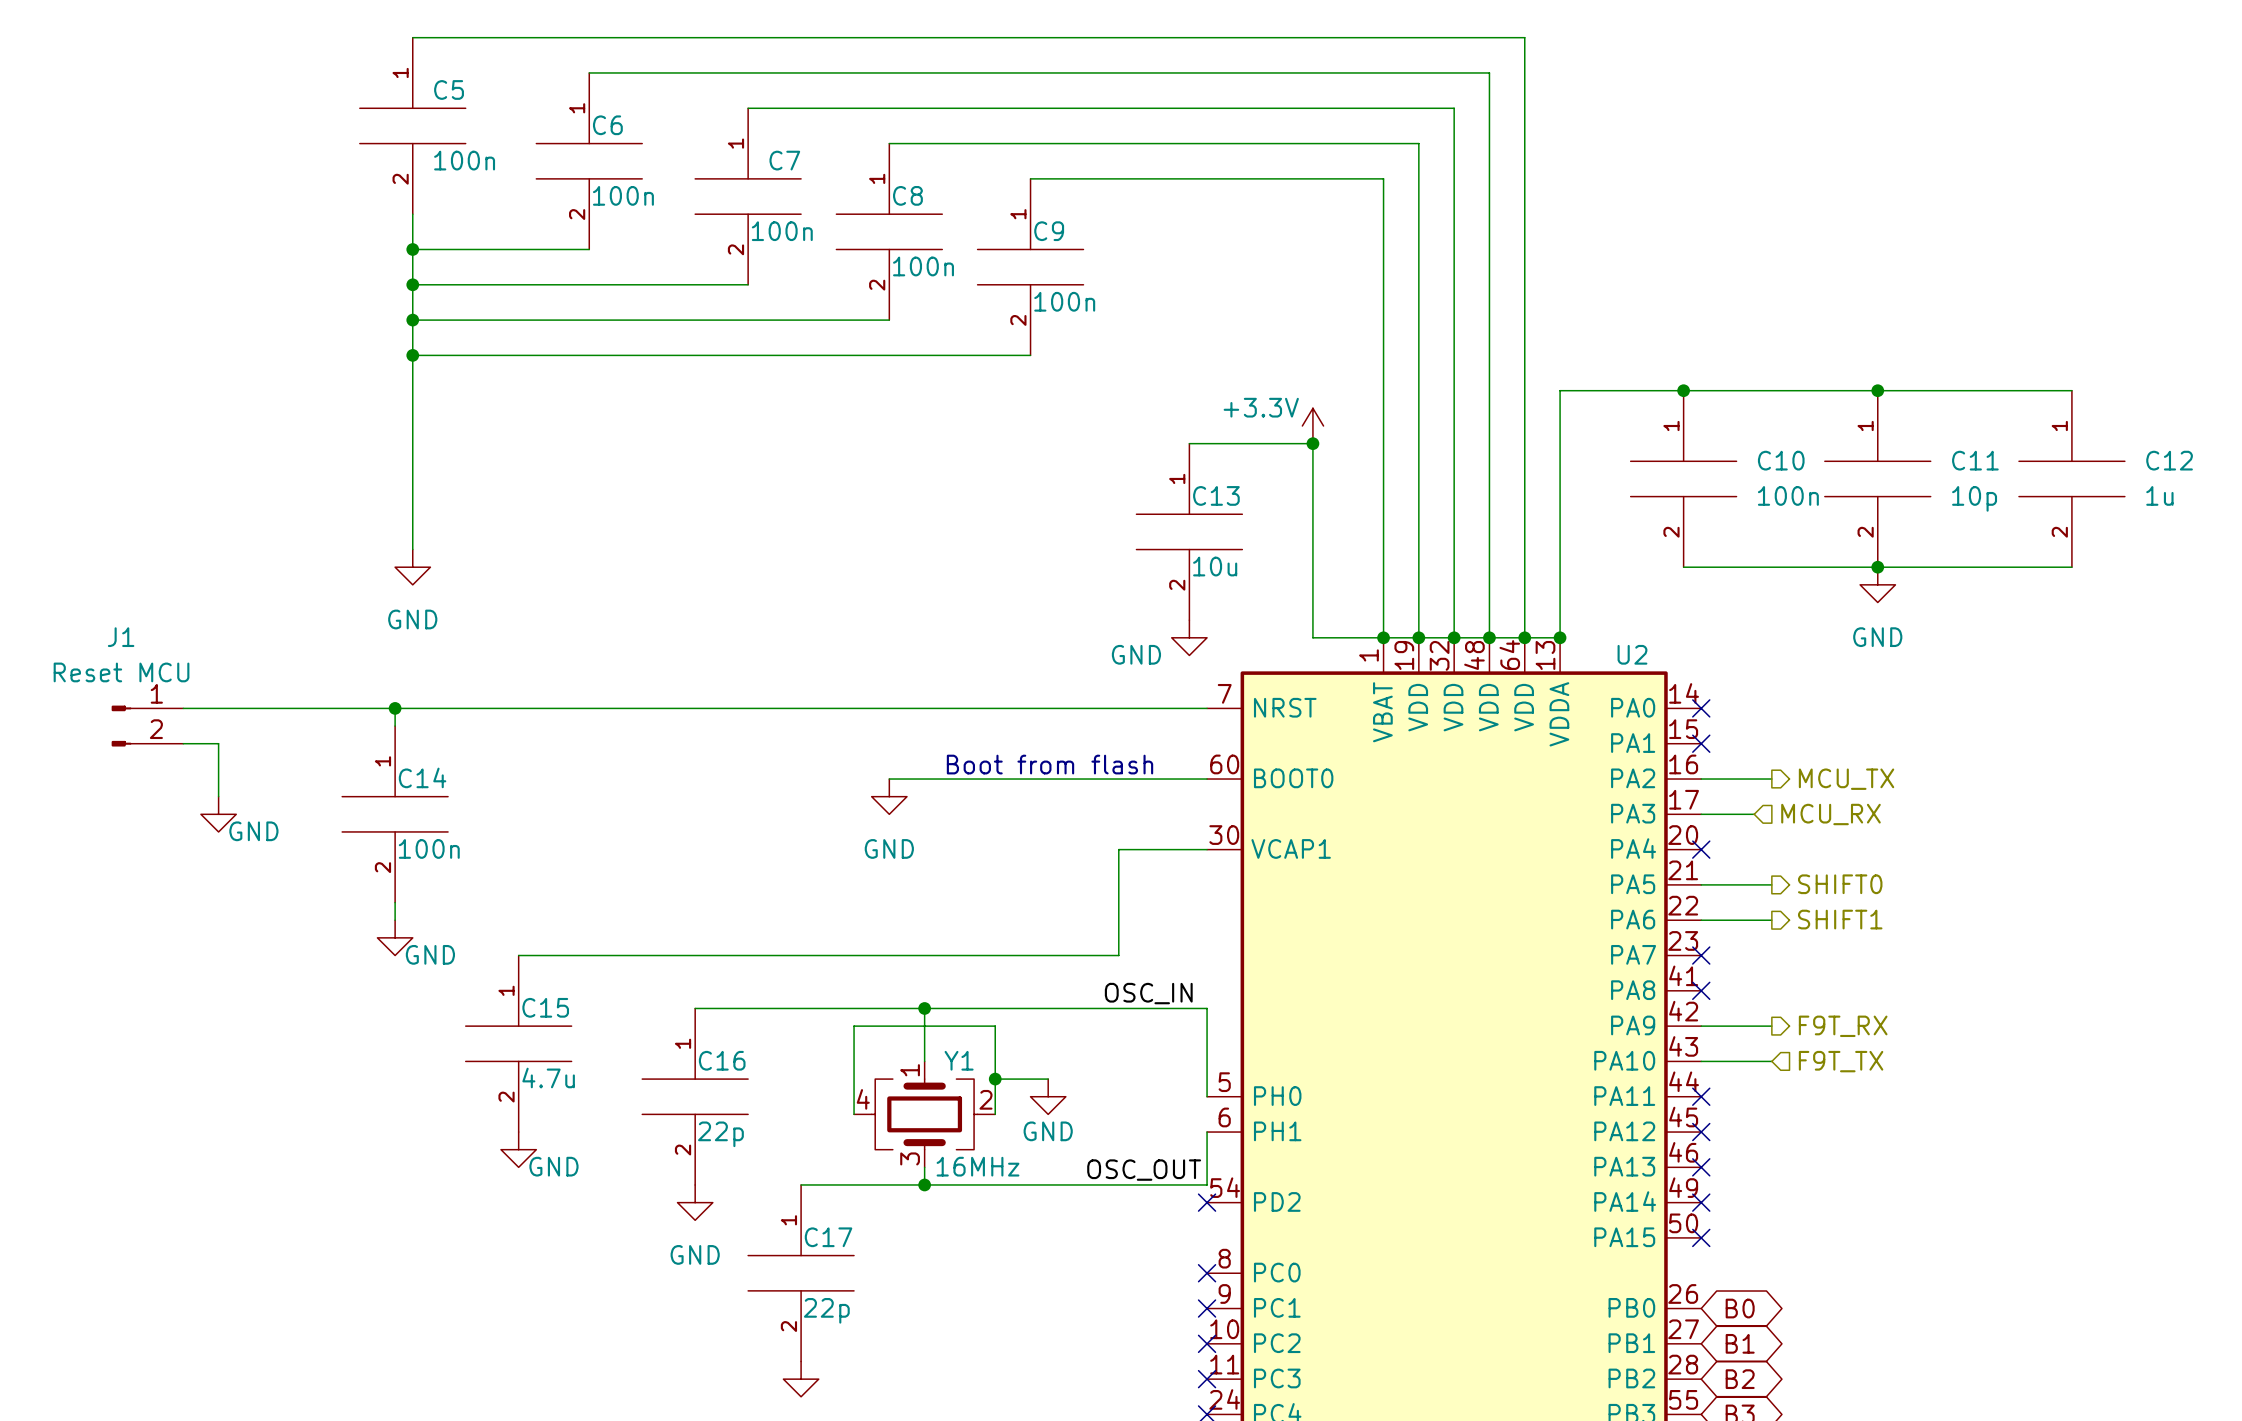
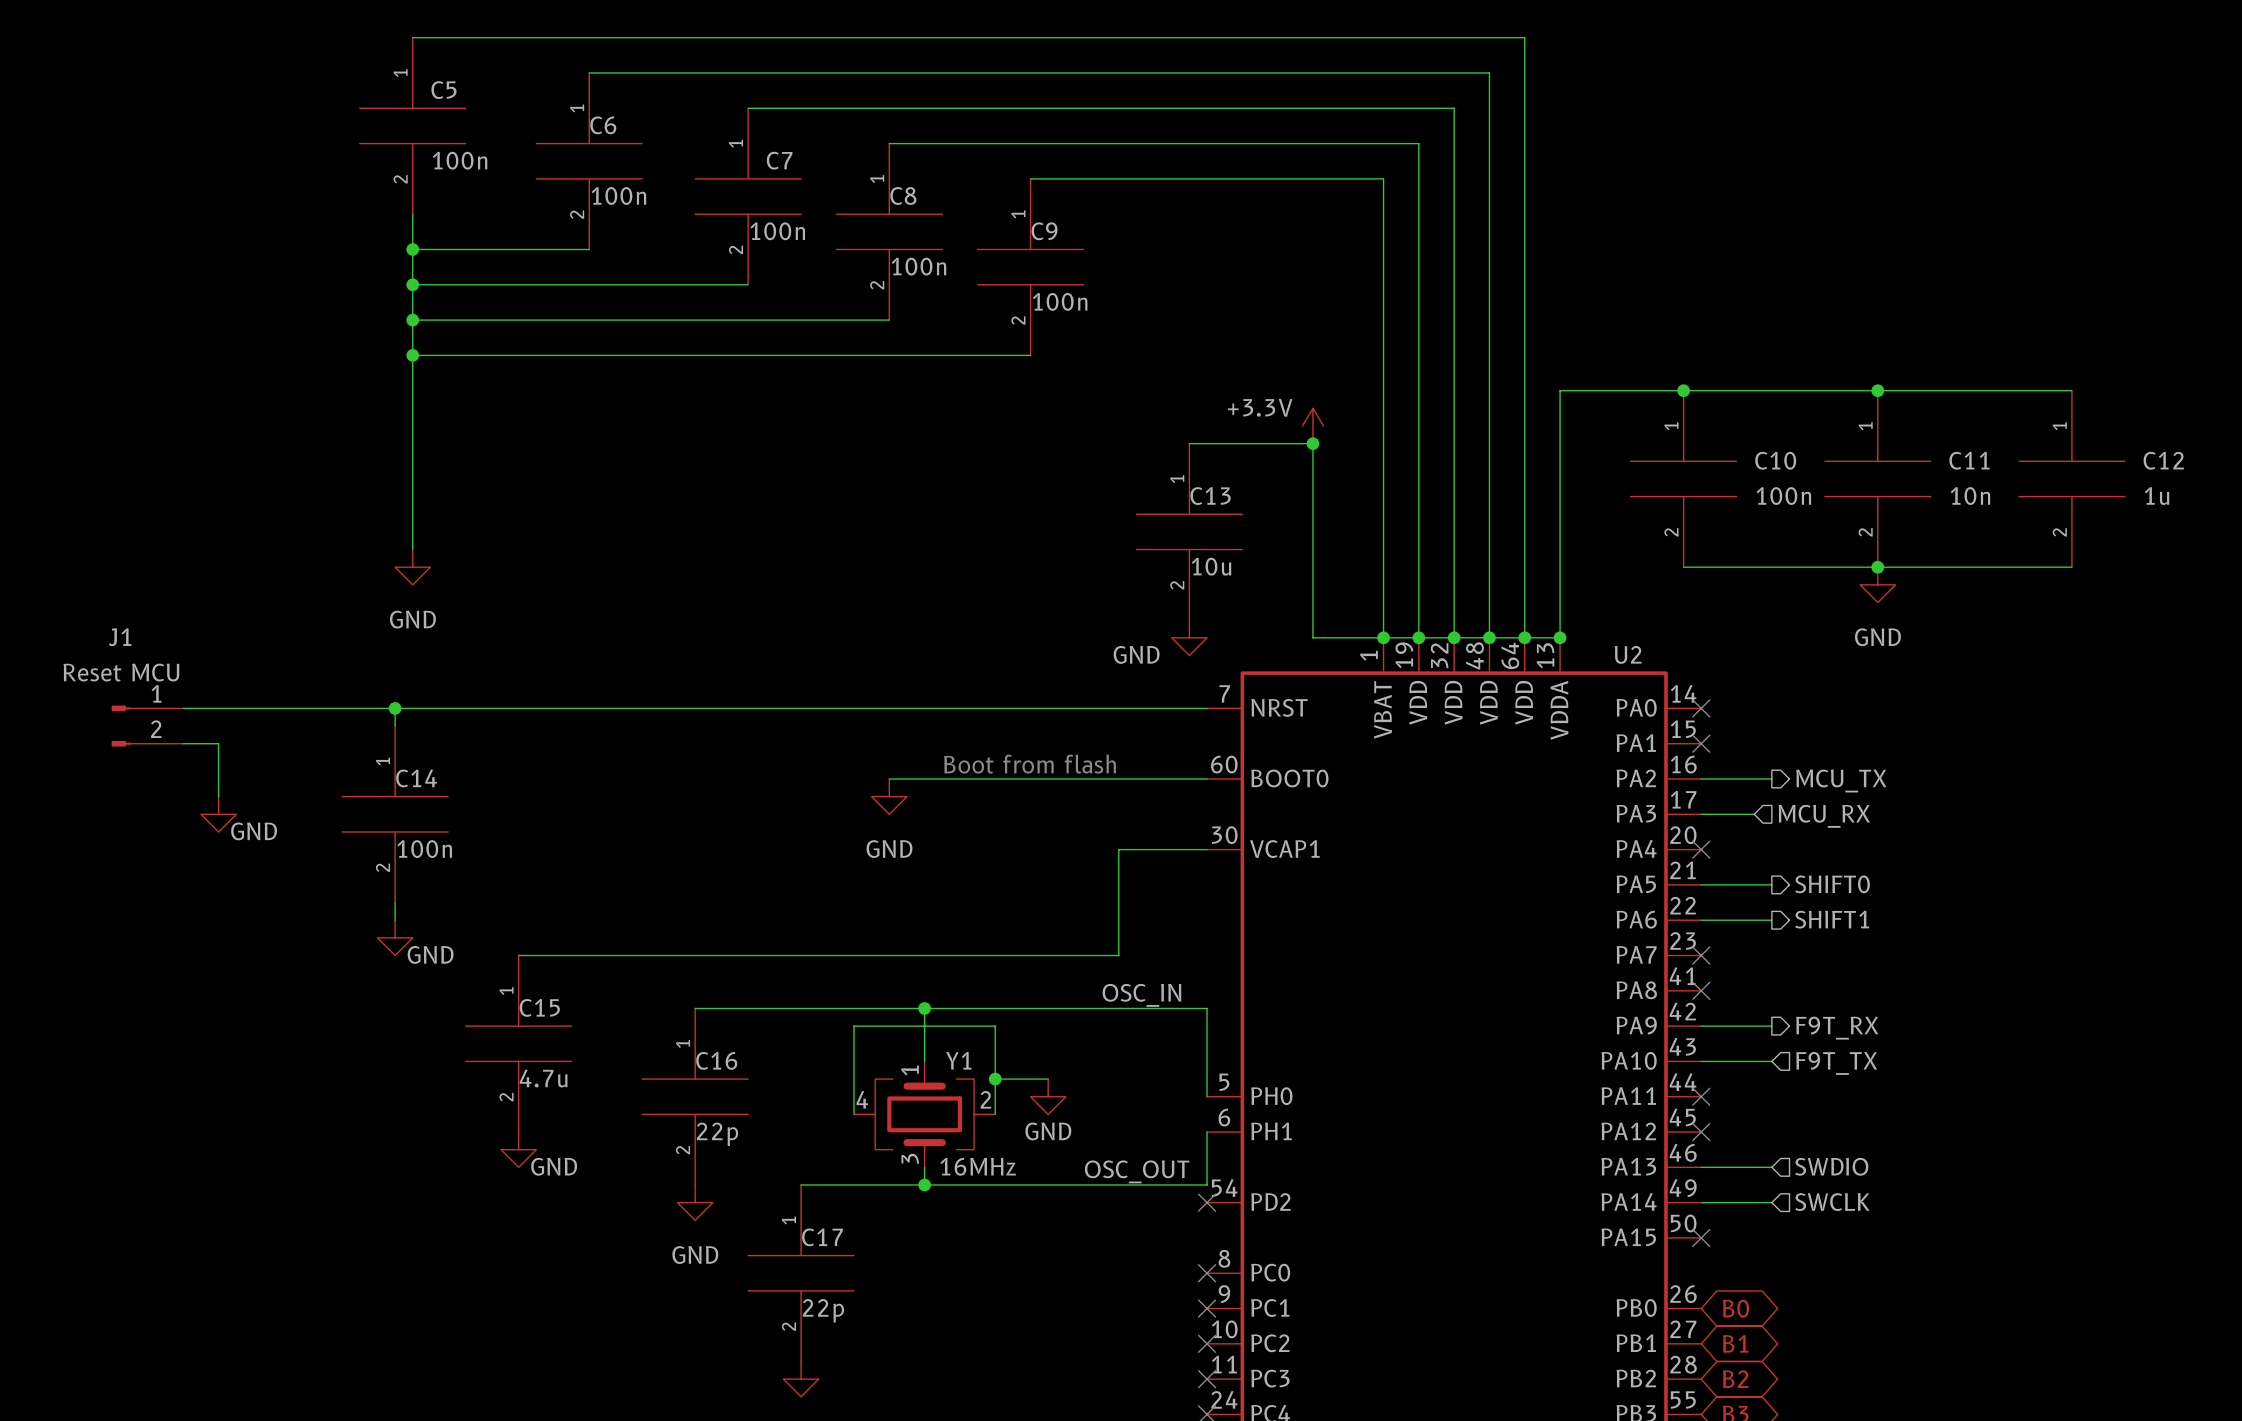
C11 value: 10p (1974, 498) -> 10n (1970, 496)
hierarchical label: none -> SWDIO (1831, 1166)
wire: none -> (1701, 1167) (1771, 1167)
no-connect mark: (1701, 1167) -> none
hierarchical label: none -> SWCLK (1832, 1202)
wire: none -> (1701, 1202) (1771, 1202)
no-connect mark: (1701, 1202) -> none

